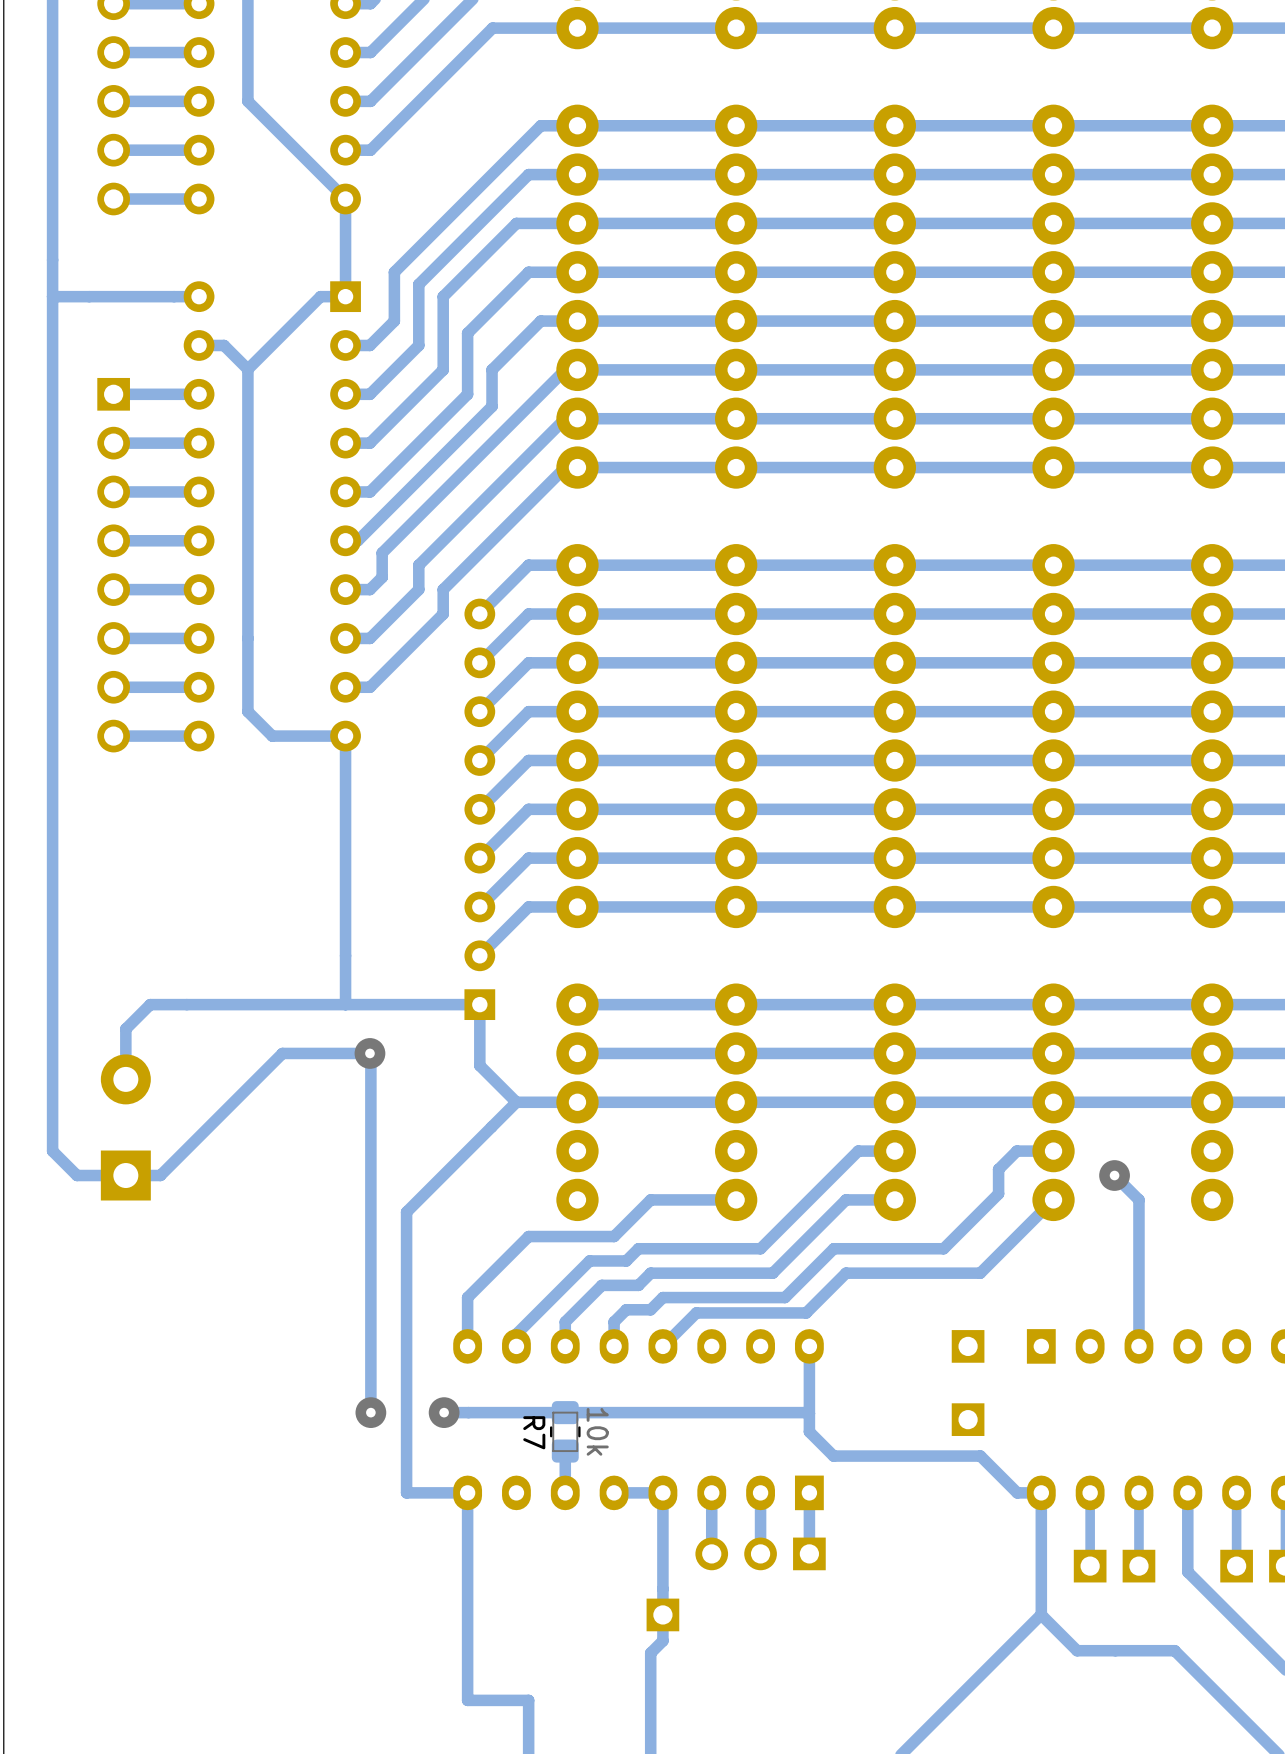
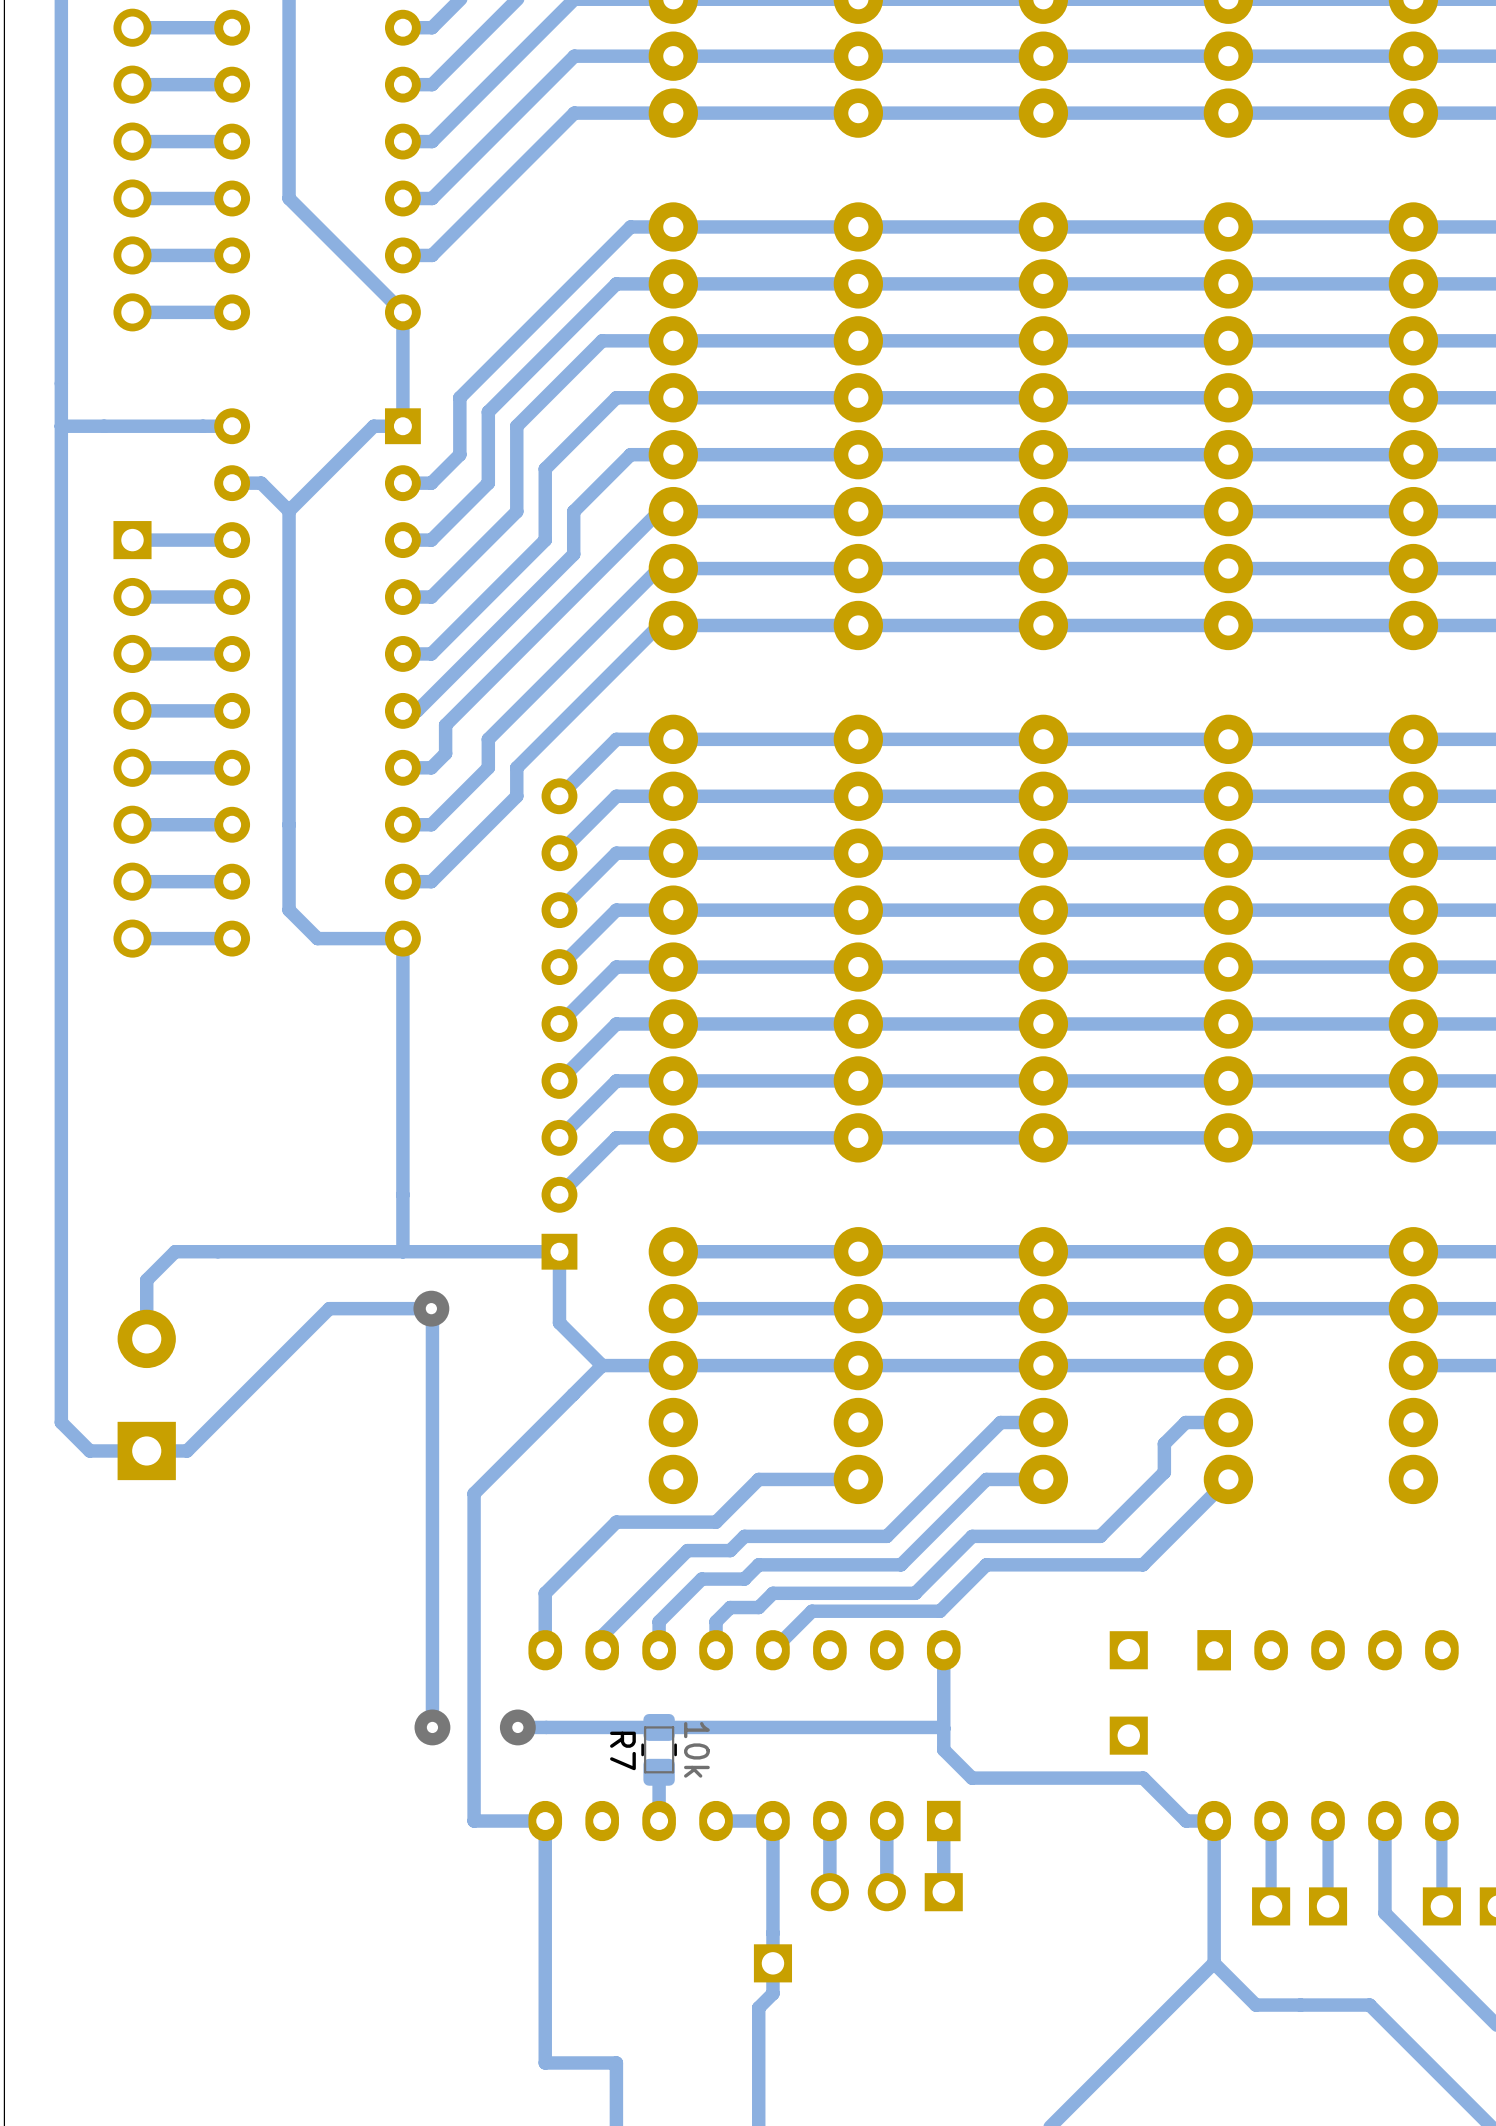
track: (1212, 1102) (1053, 1102) -> none
track: (1114, 1175) (1138, 1199) (1138, 1346) -> none
via: (1114, 1175) -> none

